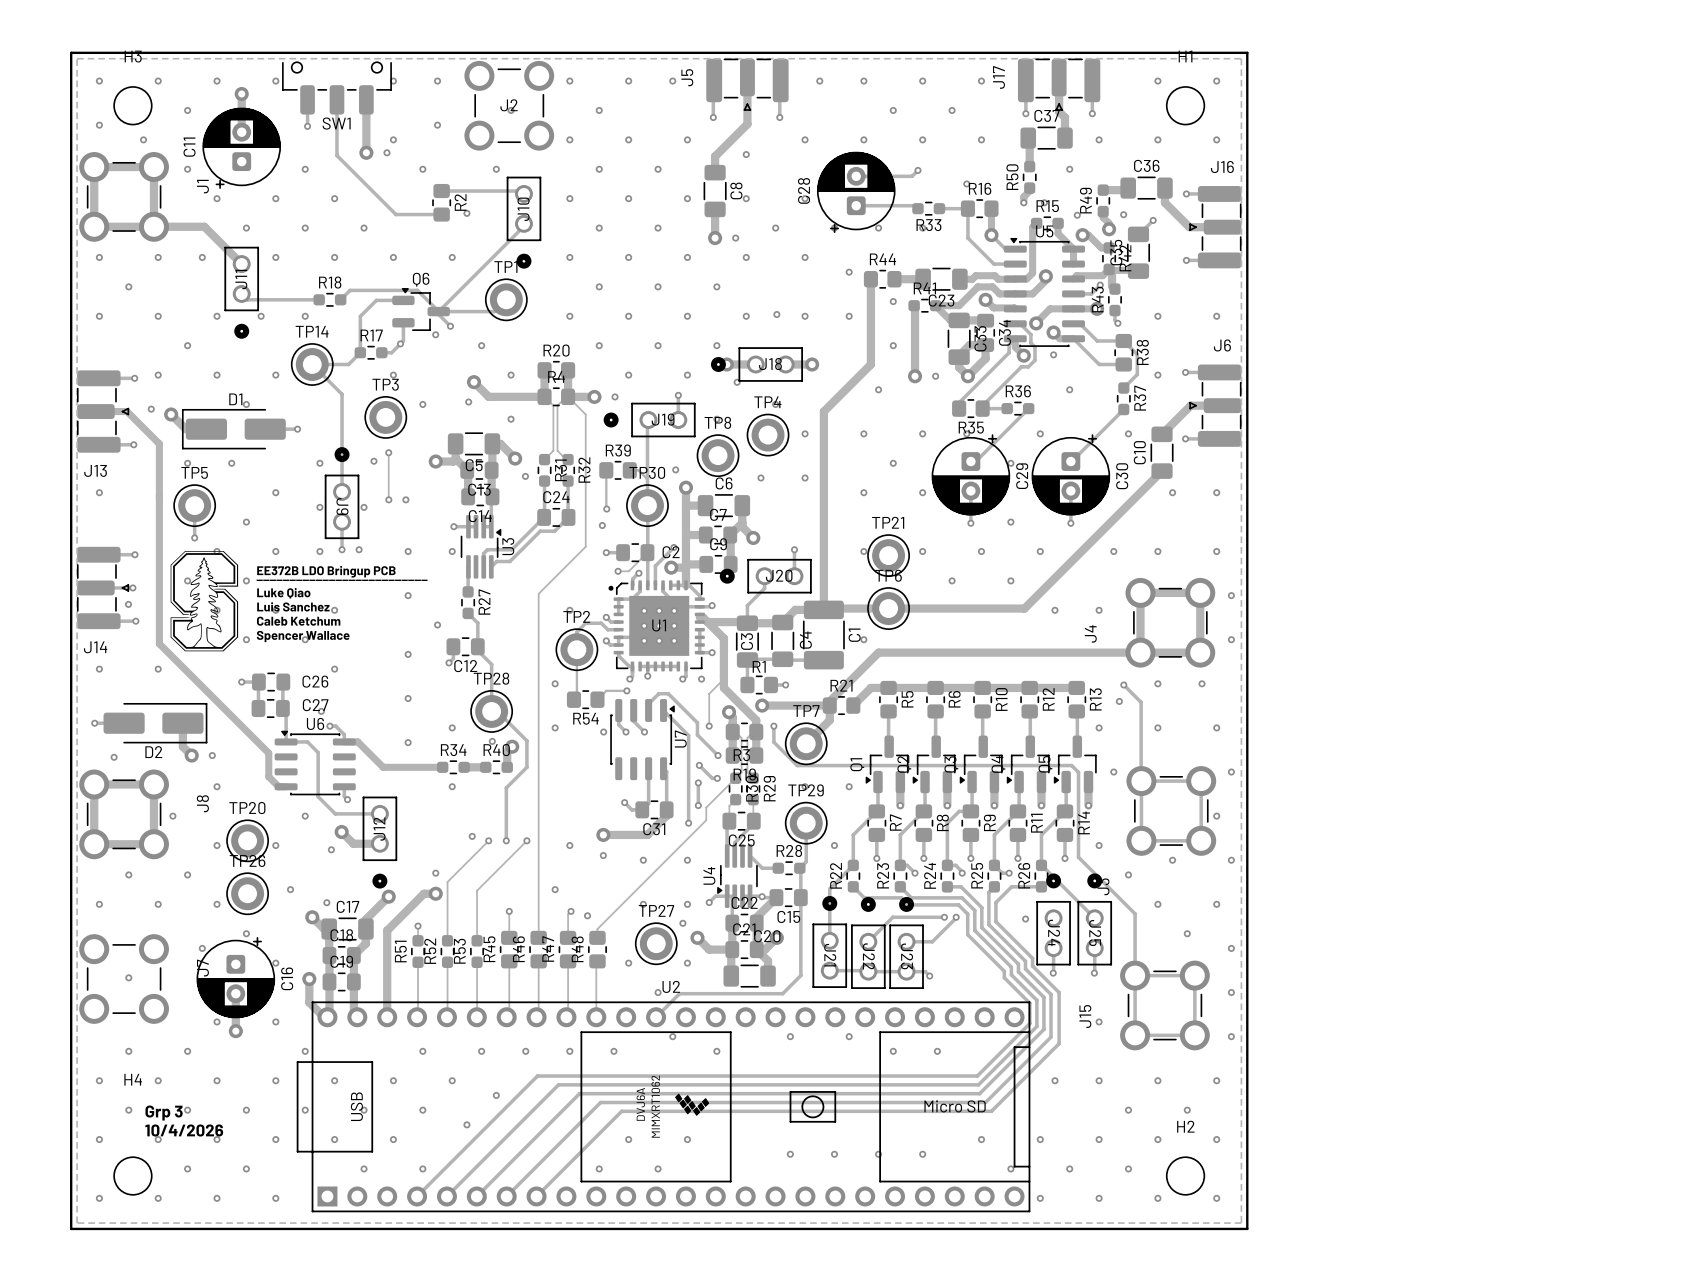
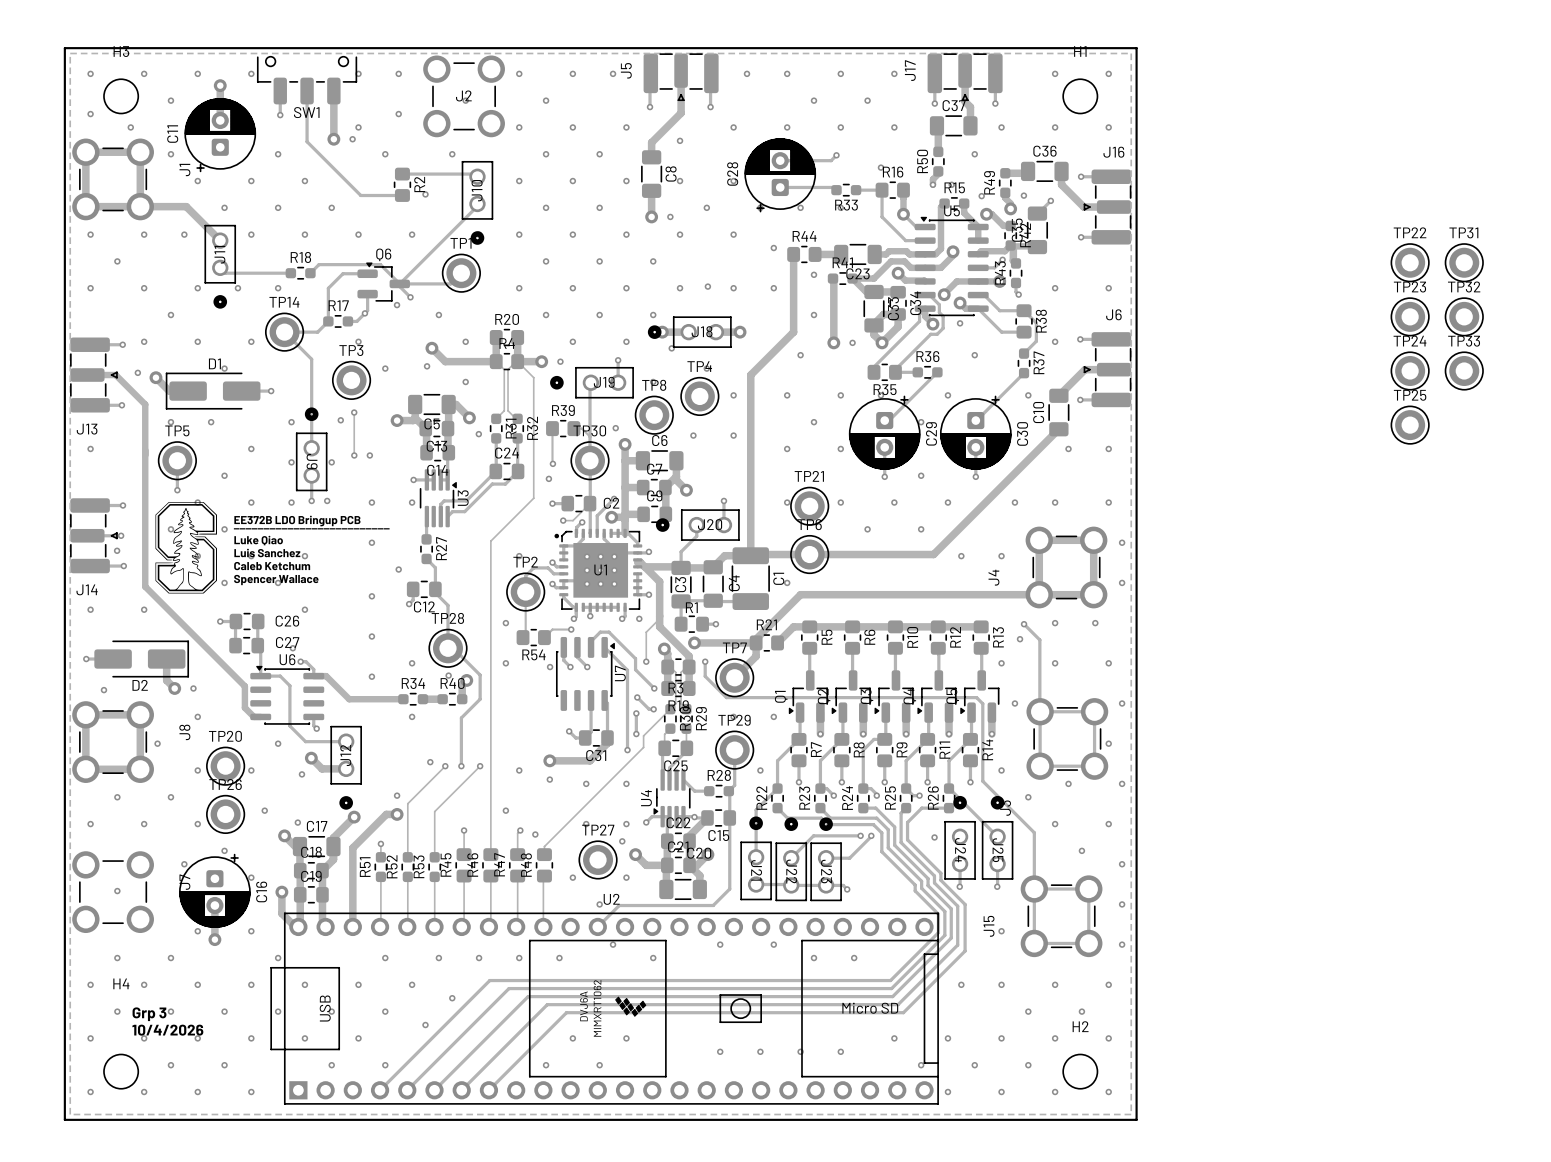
TP22: none -> (1410, 262)
TP31: none -> (1464, 262)
TP23: none -> (1410, 316)
TP32: none -> (1464, 316)
TP24: none -> (1410, 370)
TP33: none -> (1464, 370)
TP25: none -> (1410, 425)

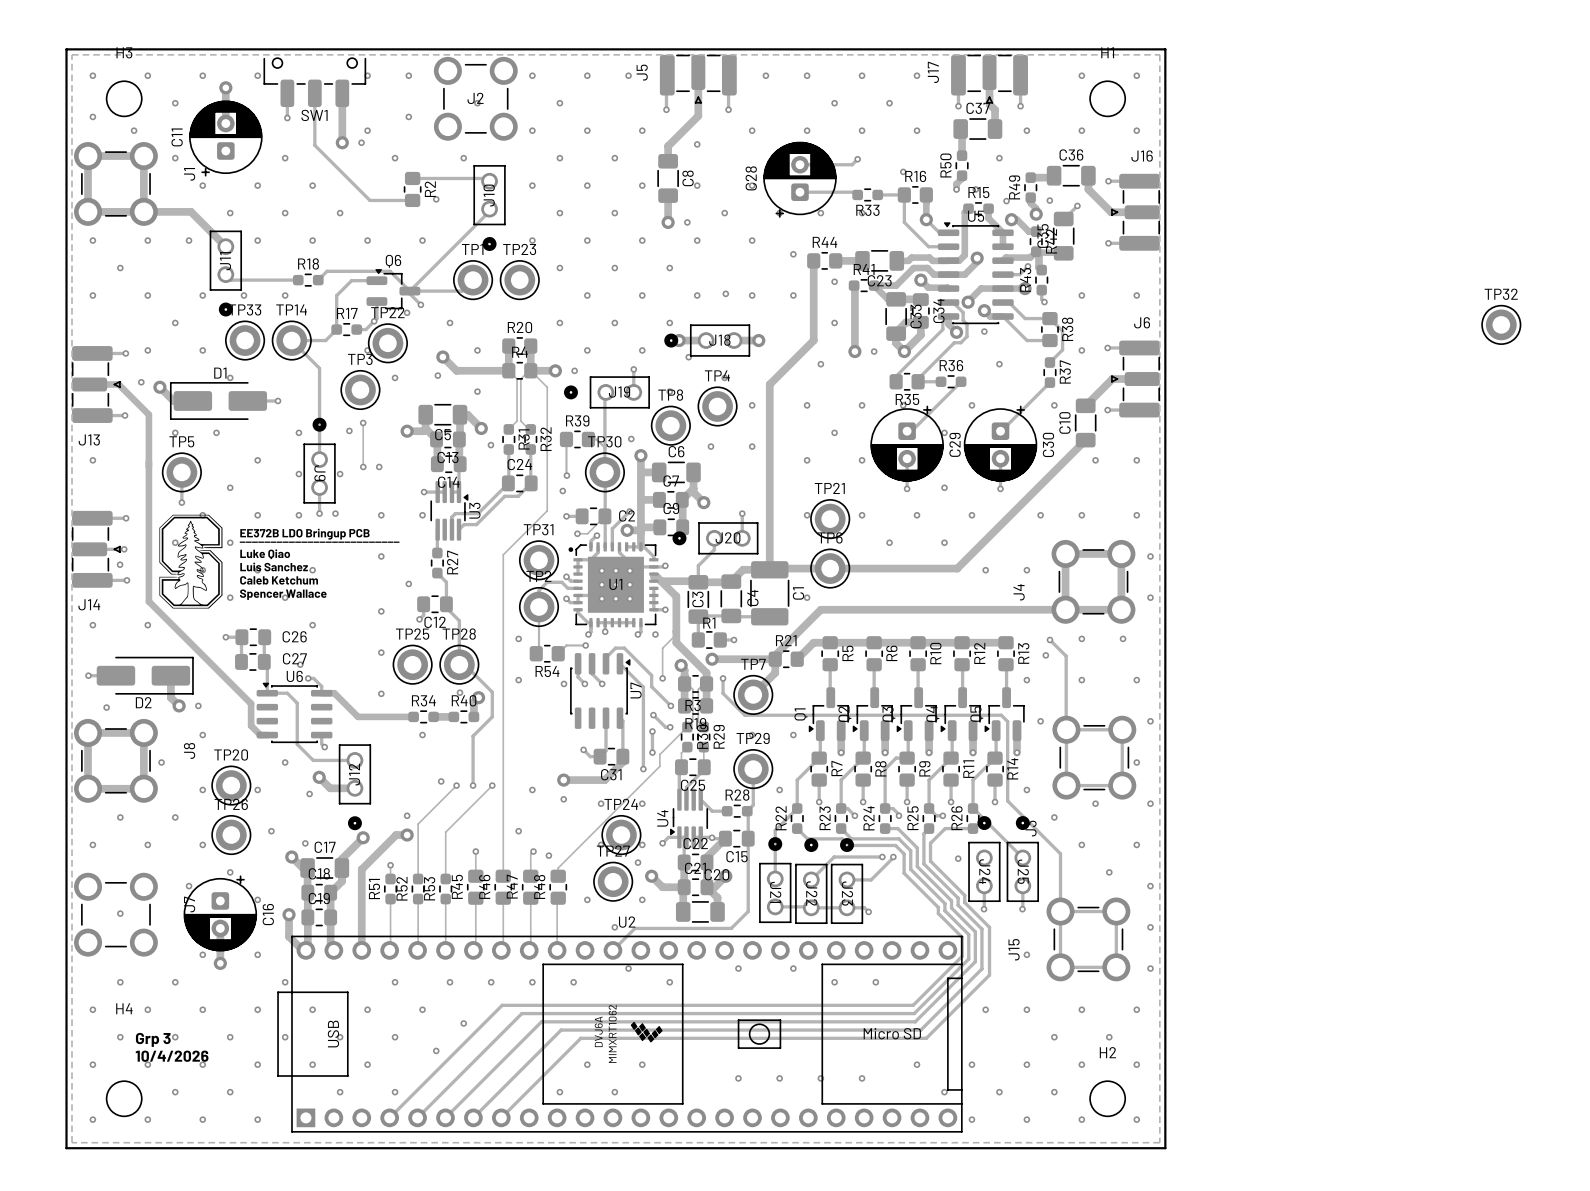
TP22 position: (1410, 262) -> (387, 343)
TP31 position: (1464, 262) -> (539, 560)
via: (519, 288) -> none
TP23 position: (1410, 316) -> (519, 280)
via: (251, 341) -> none
TP24 position: (1410, 370) -> (621, 835)
TP33 position: (1464, 370) -> (245, 340)
TP25 position: (1410, 425) -> (412, 664)
via: (519, 556) -> none
via: (412, 663) -> none

